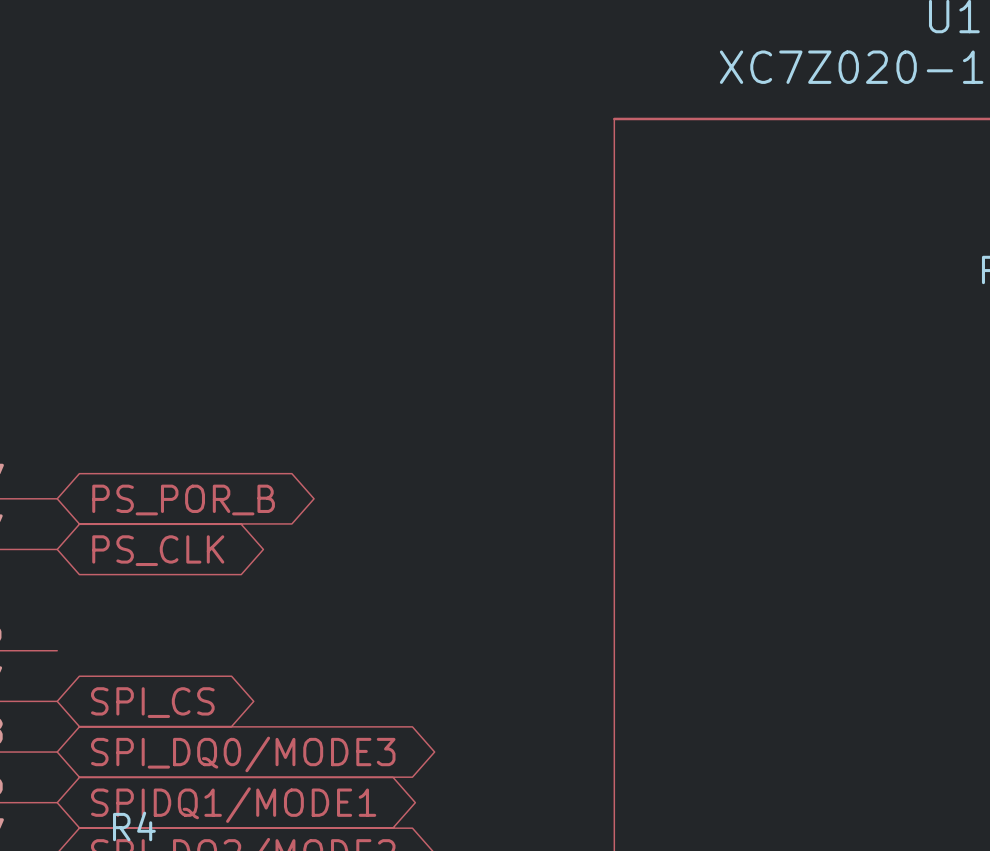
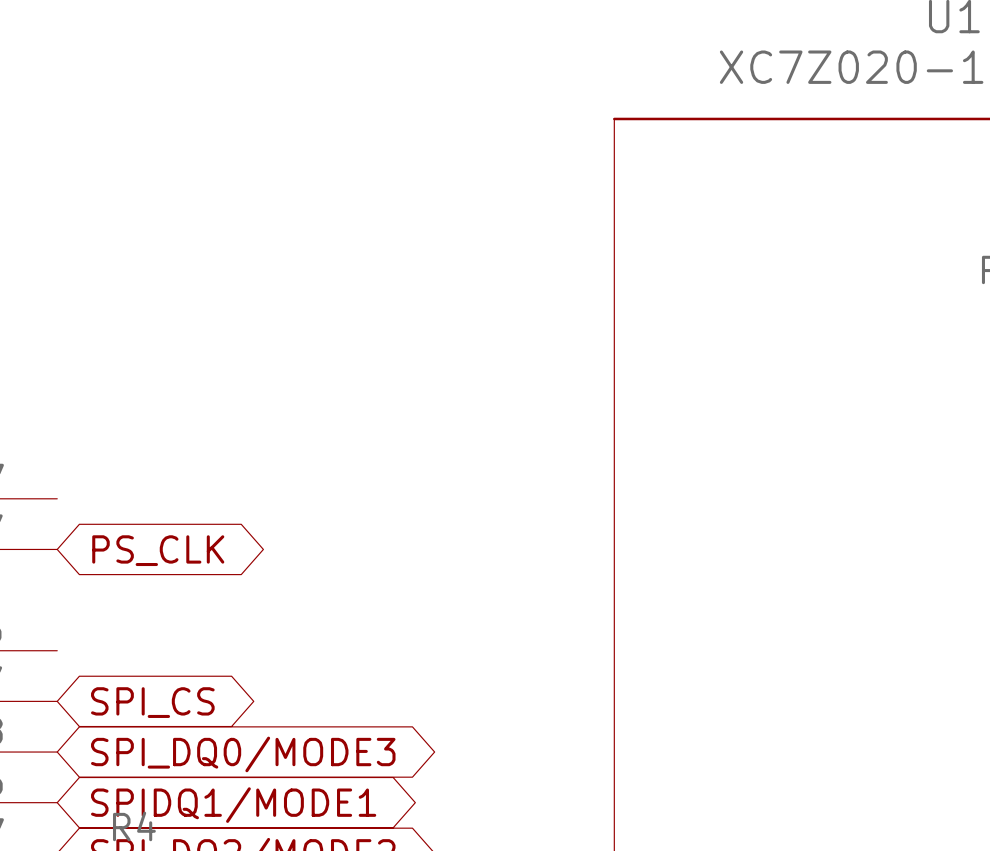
global label: PS_POR_B (183, 500) -> none

